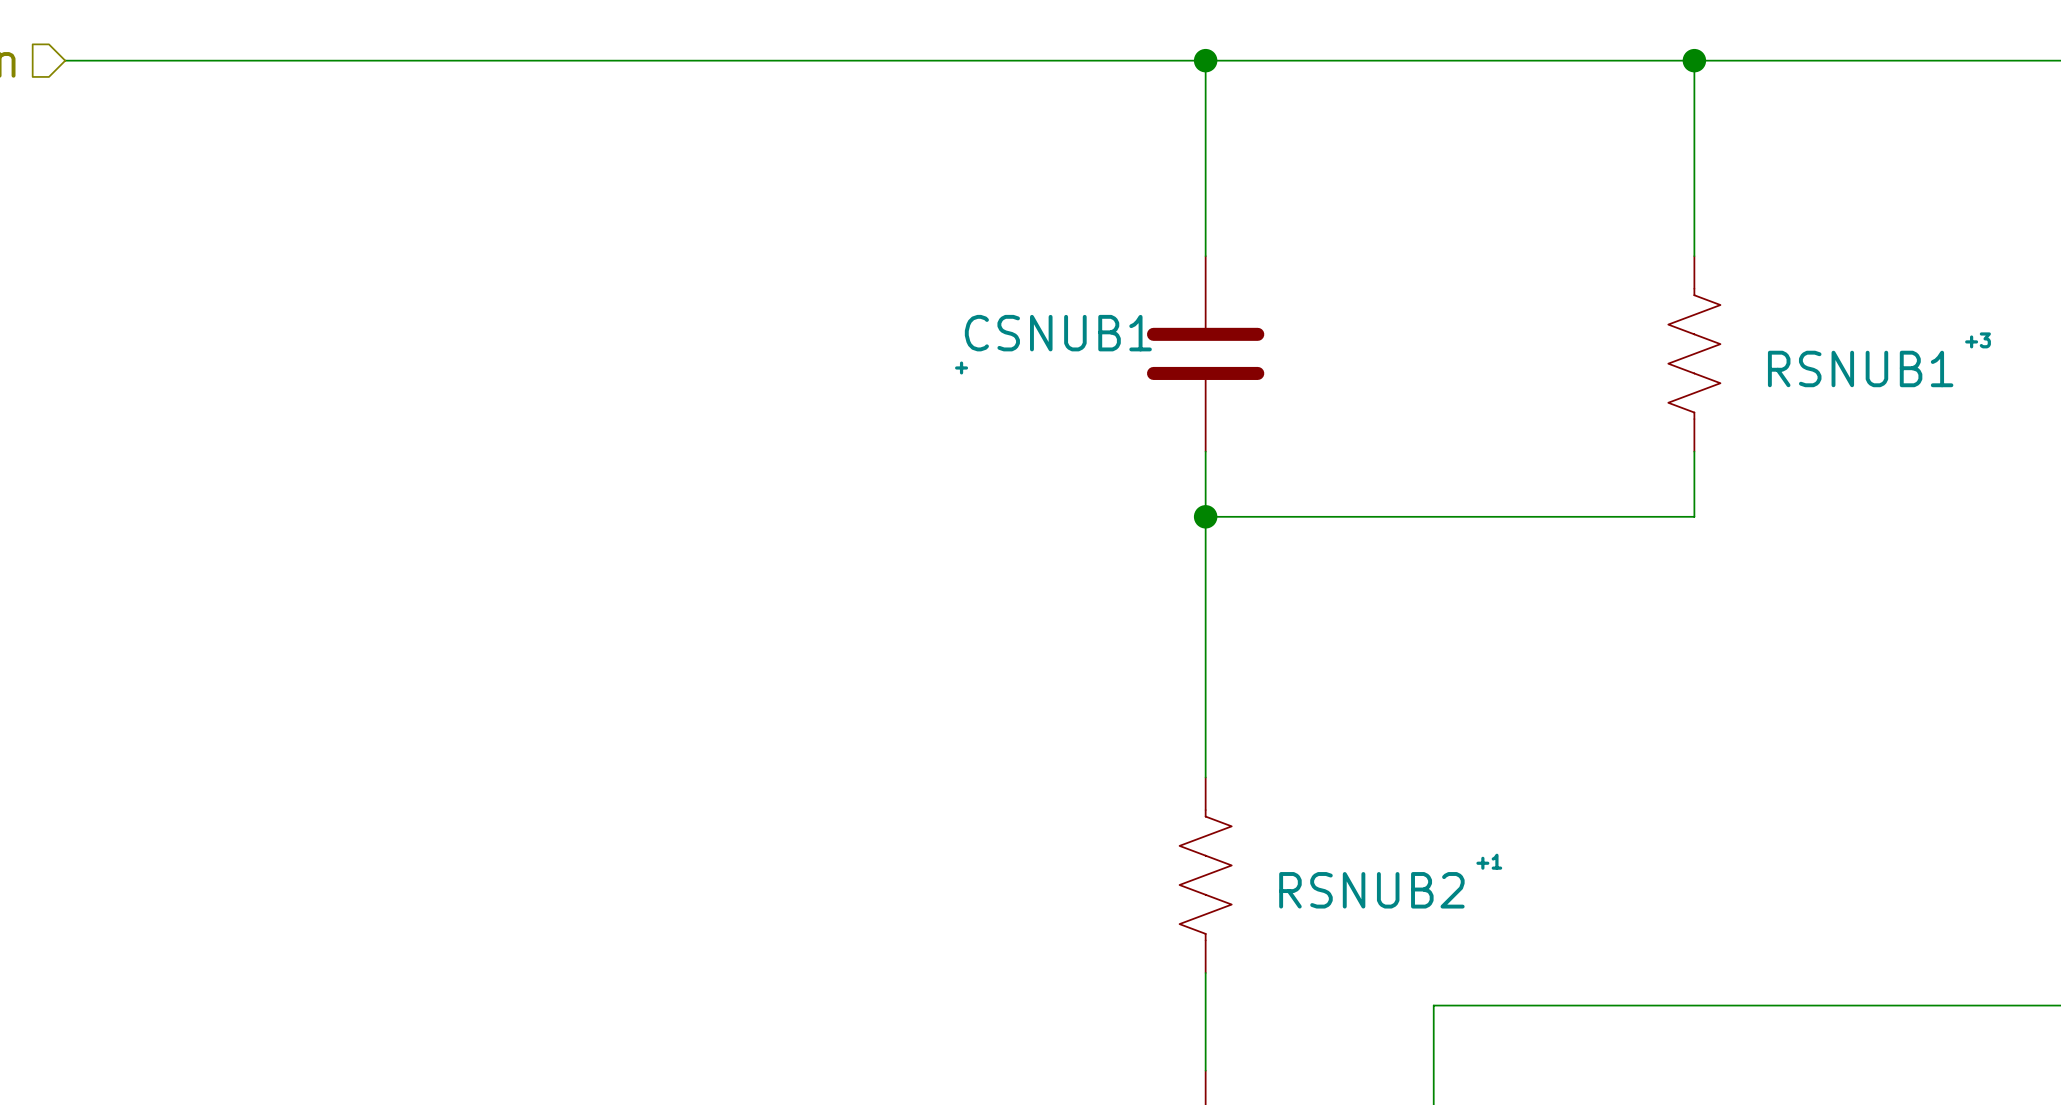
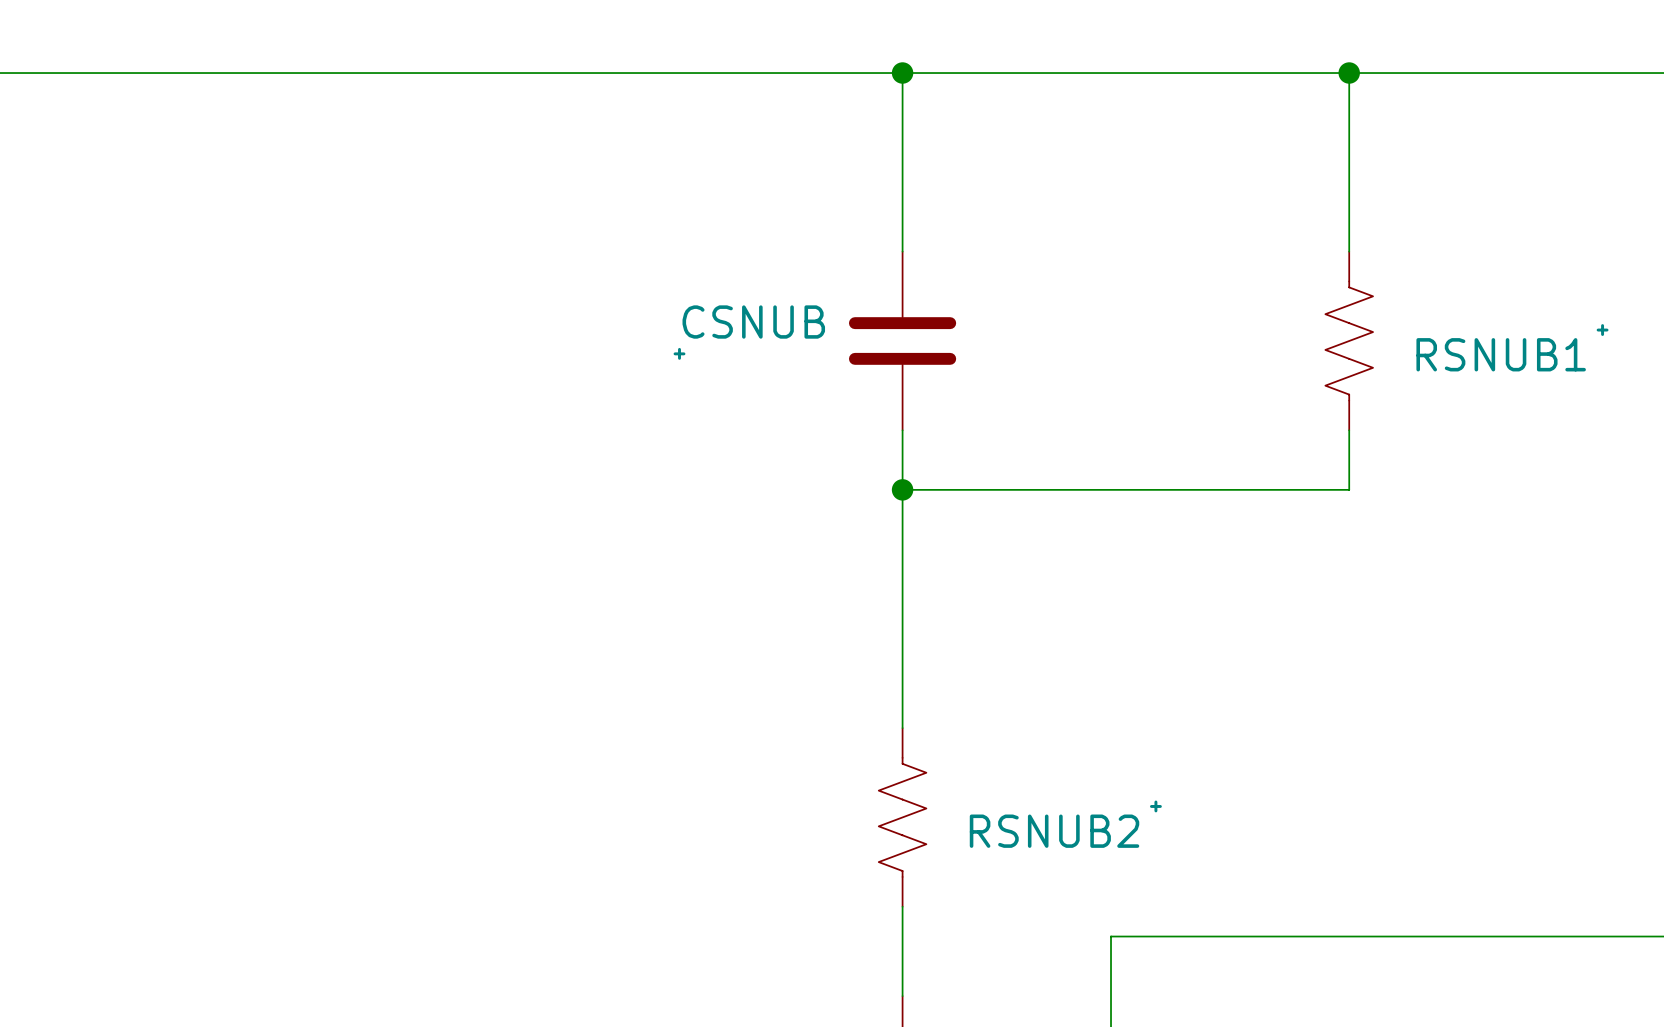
CSNUB1 name: CSNUB1 (1058, 333) -> CSNUB (753, 322)
+3 name: +3 (1978, 340) -> + (1602, 330)
+1 name: +1 (1489, 861) -> + (1155, 806)

